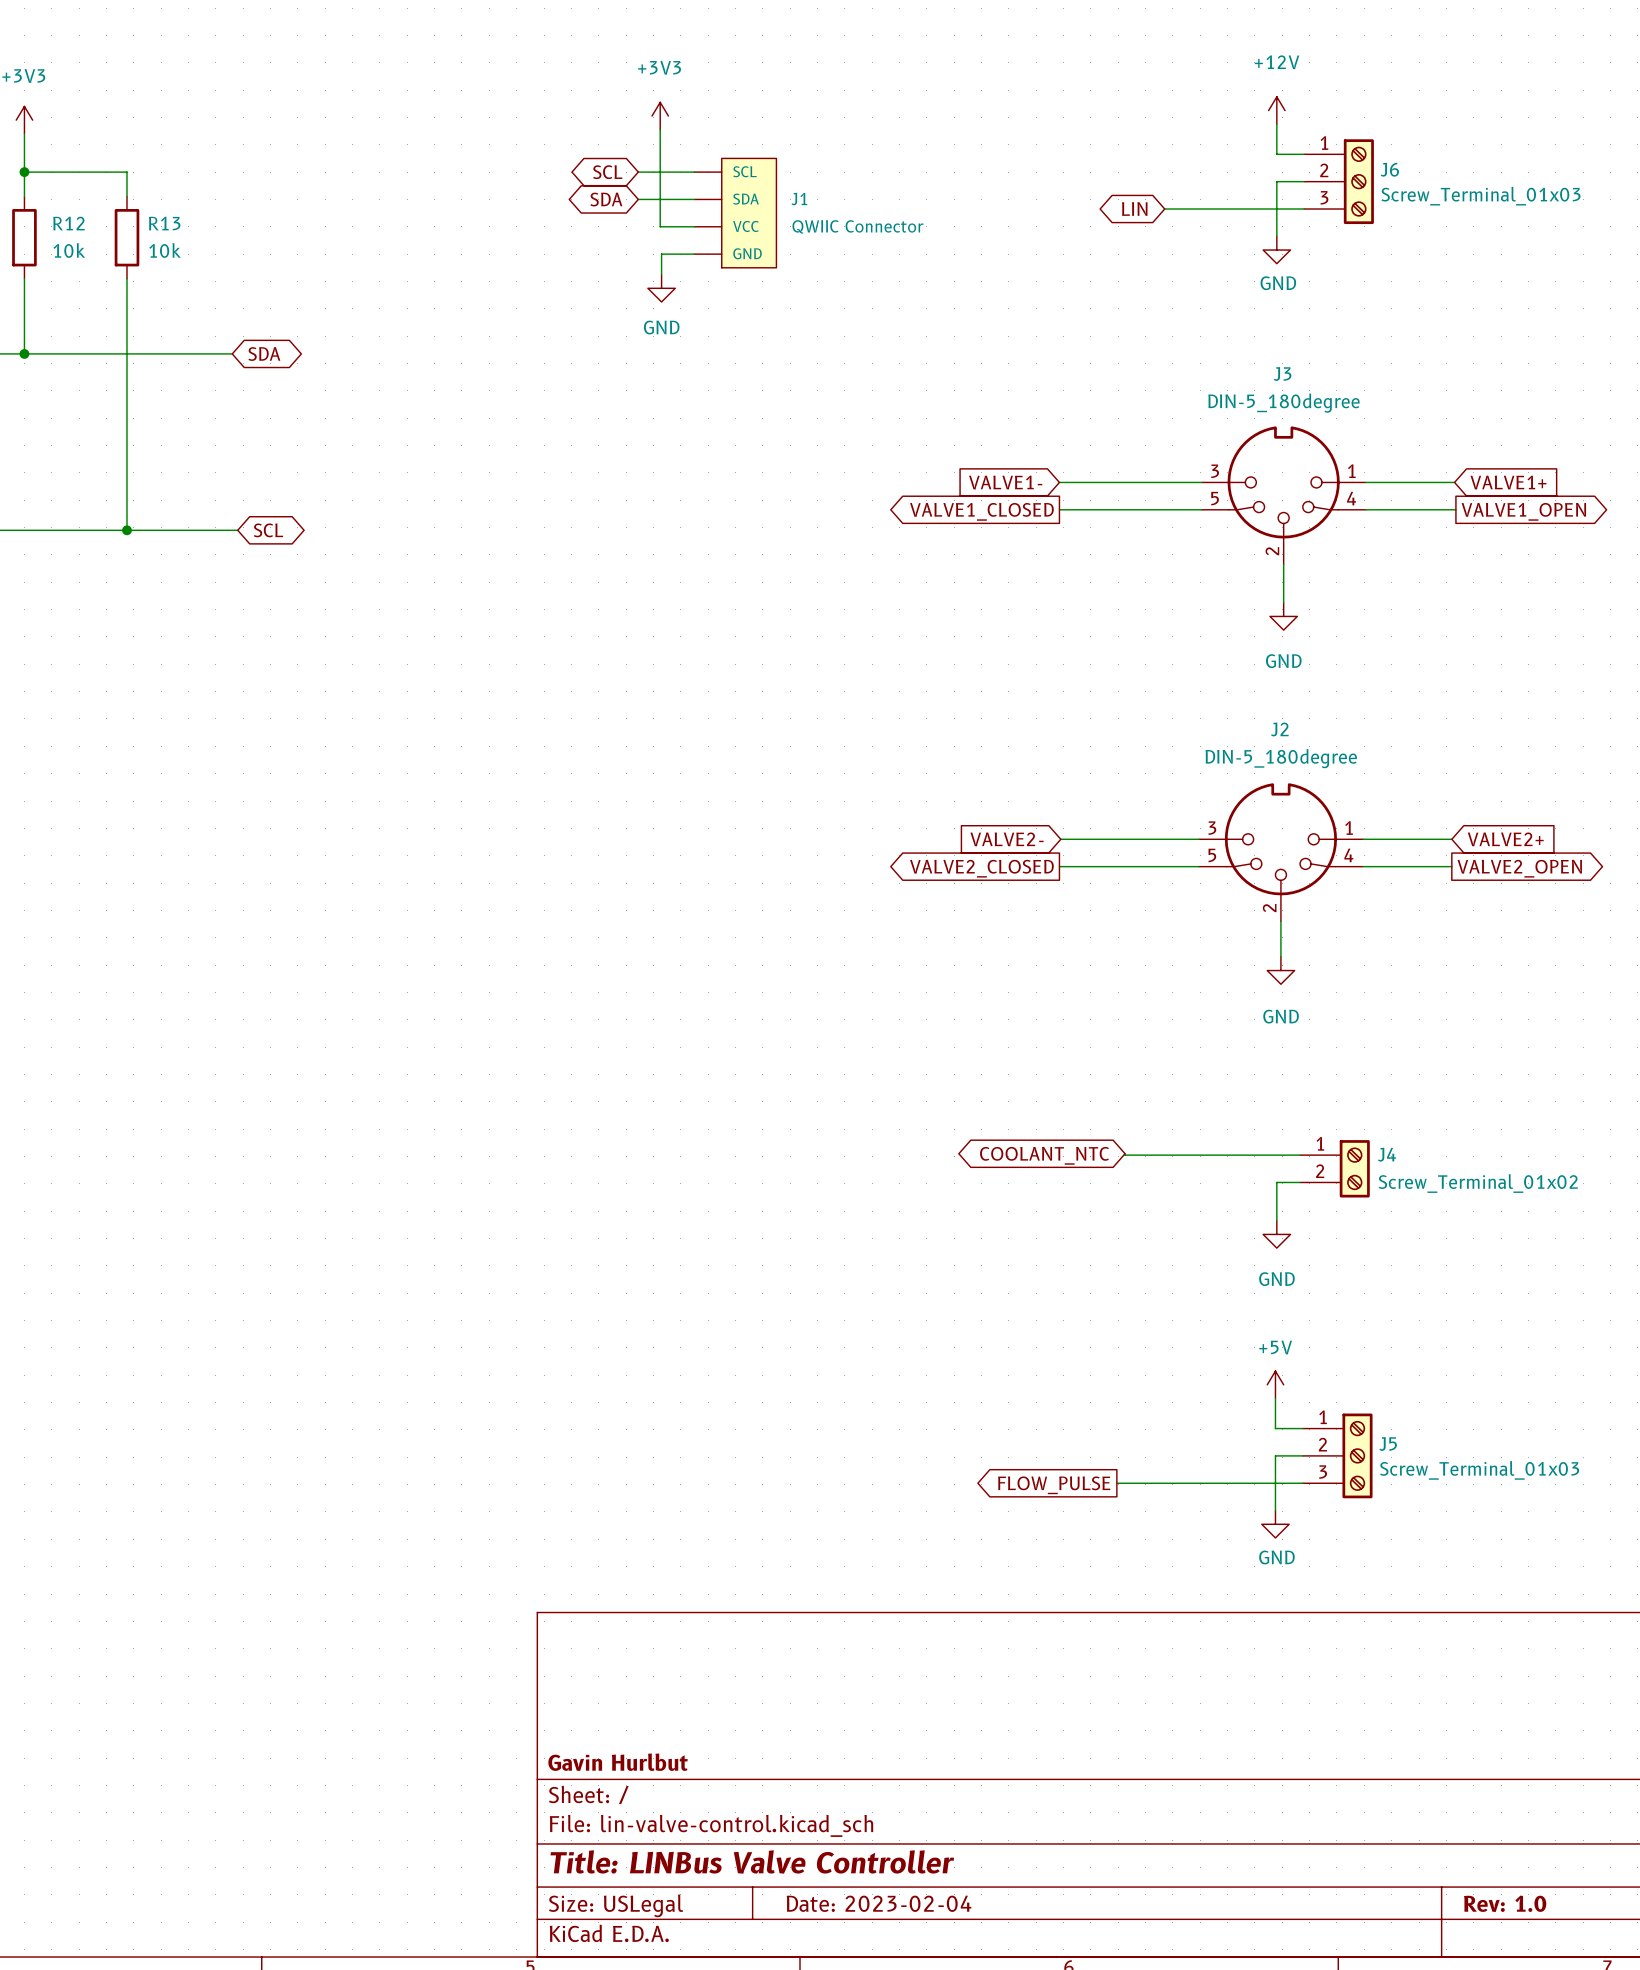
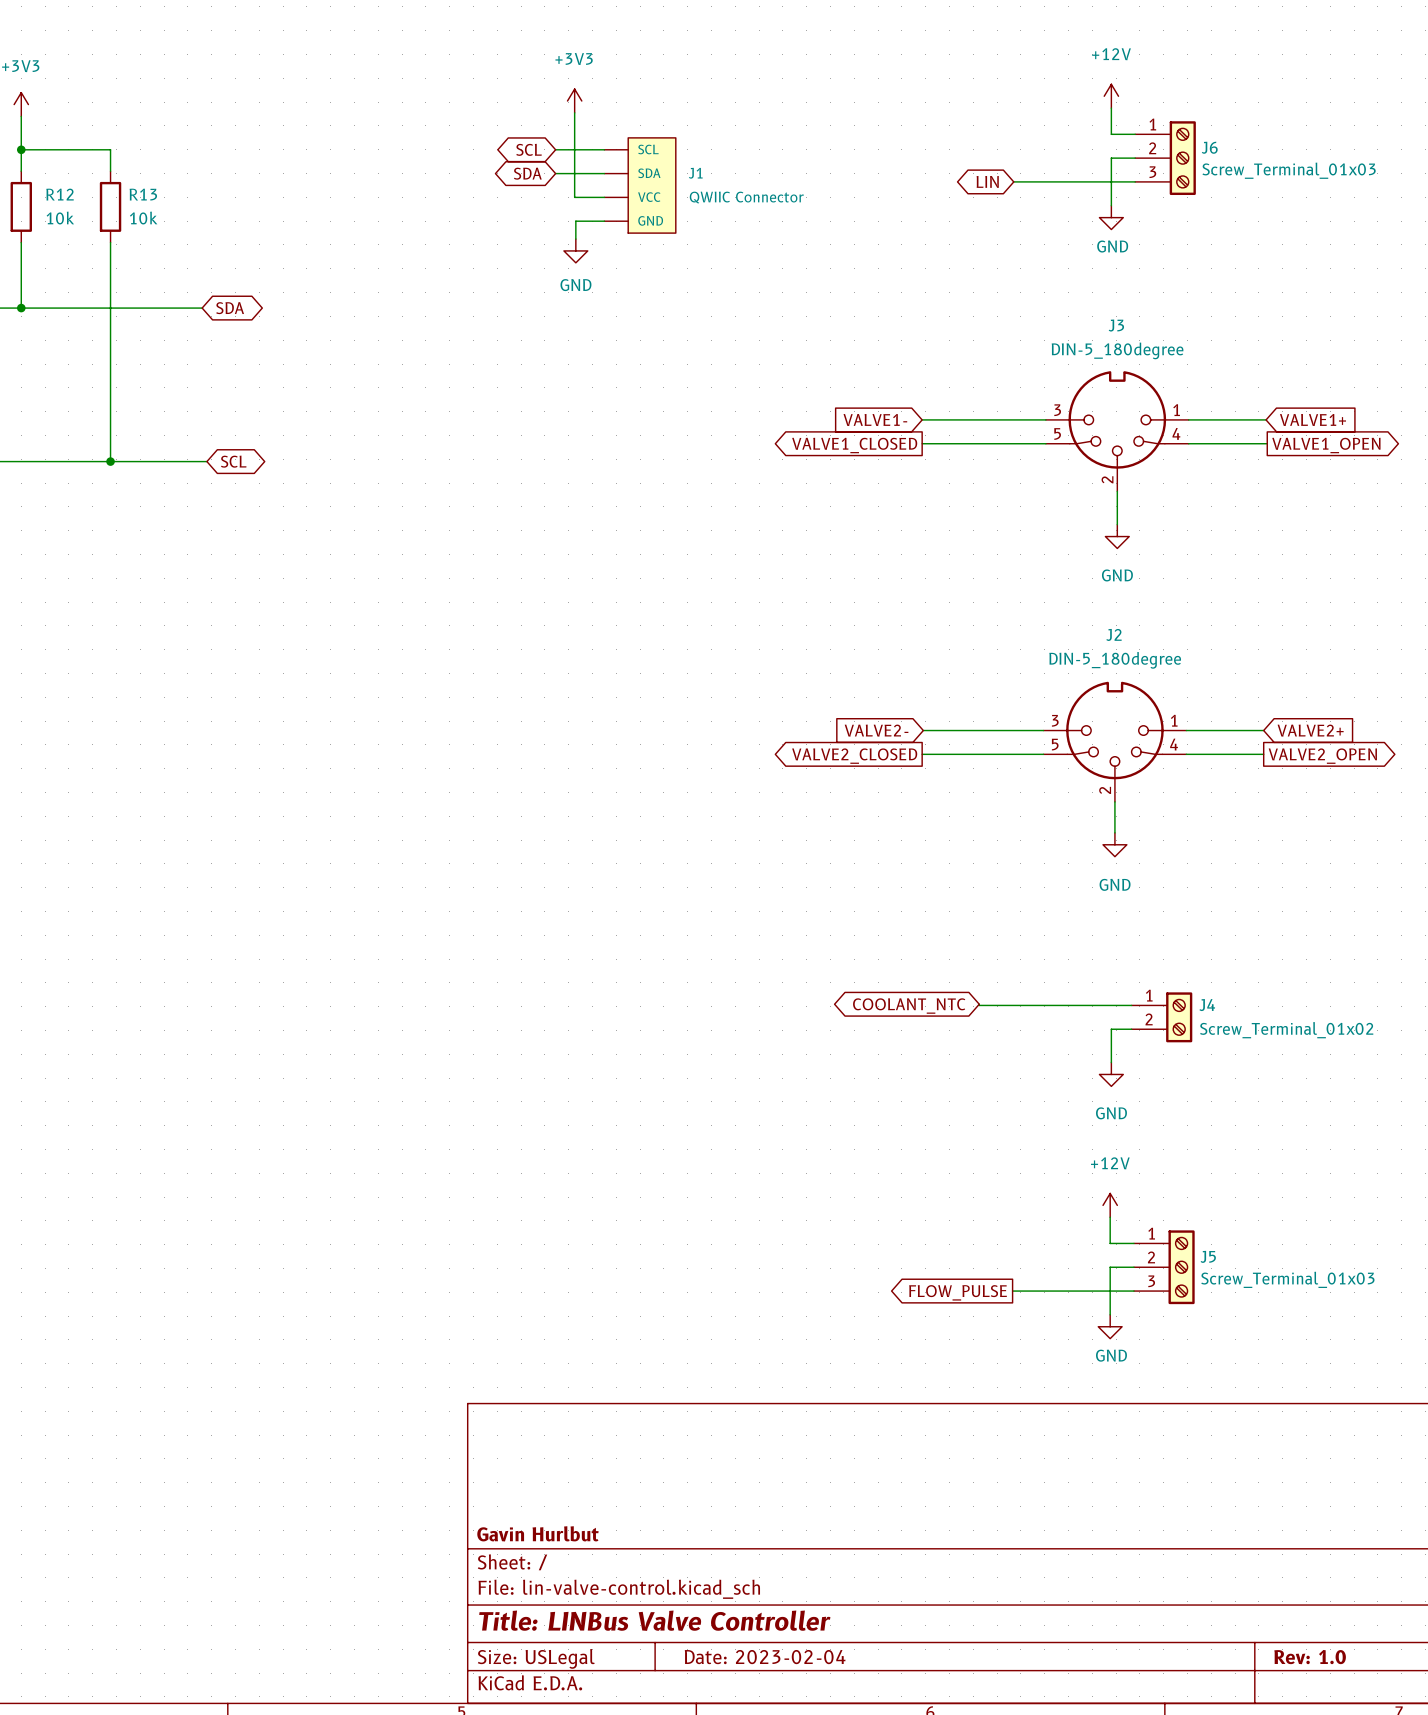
power symbol: +5V (1275, 1384) -> +12V (1110, 1205)
wire: (1116, 1483) (1163, 1483) -> none
global label position: FLOW_PULSE (1054, 1485) -> FLOW_PULSE (958, 1292)

